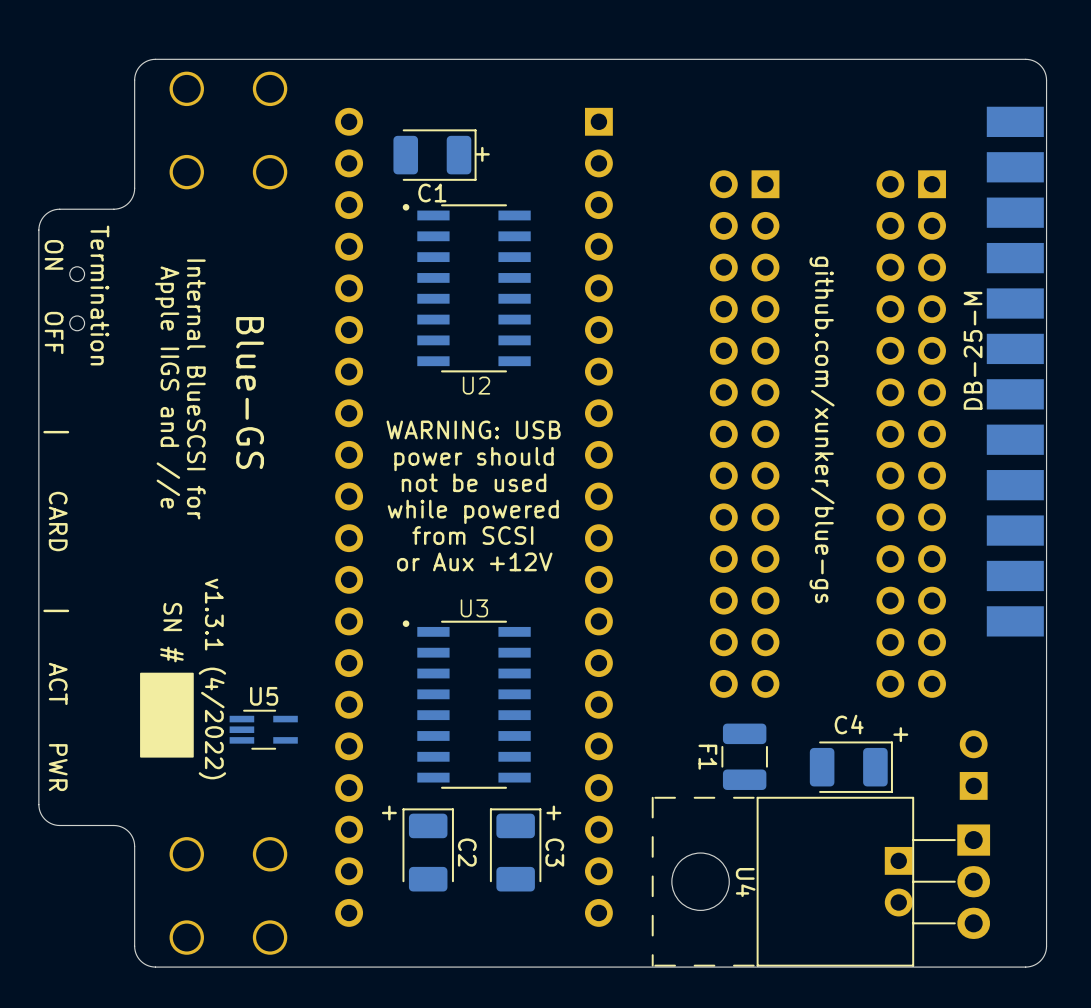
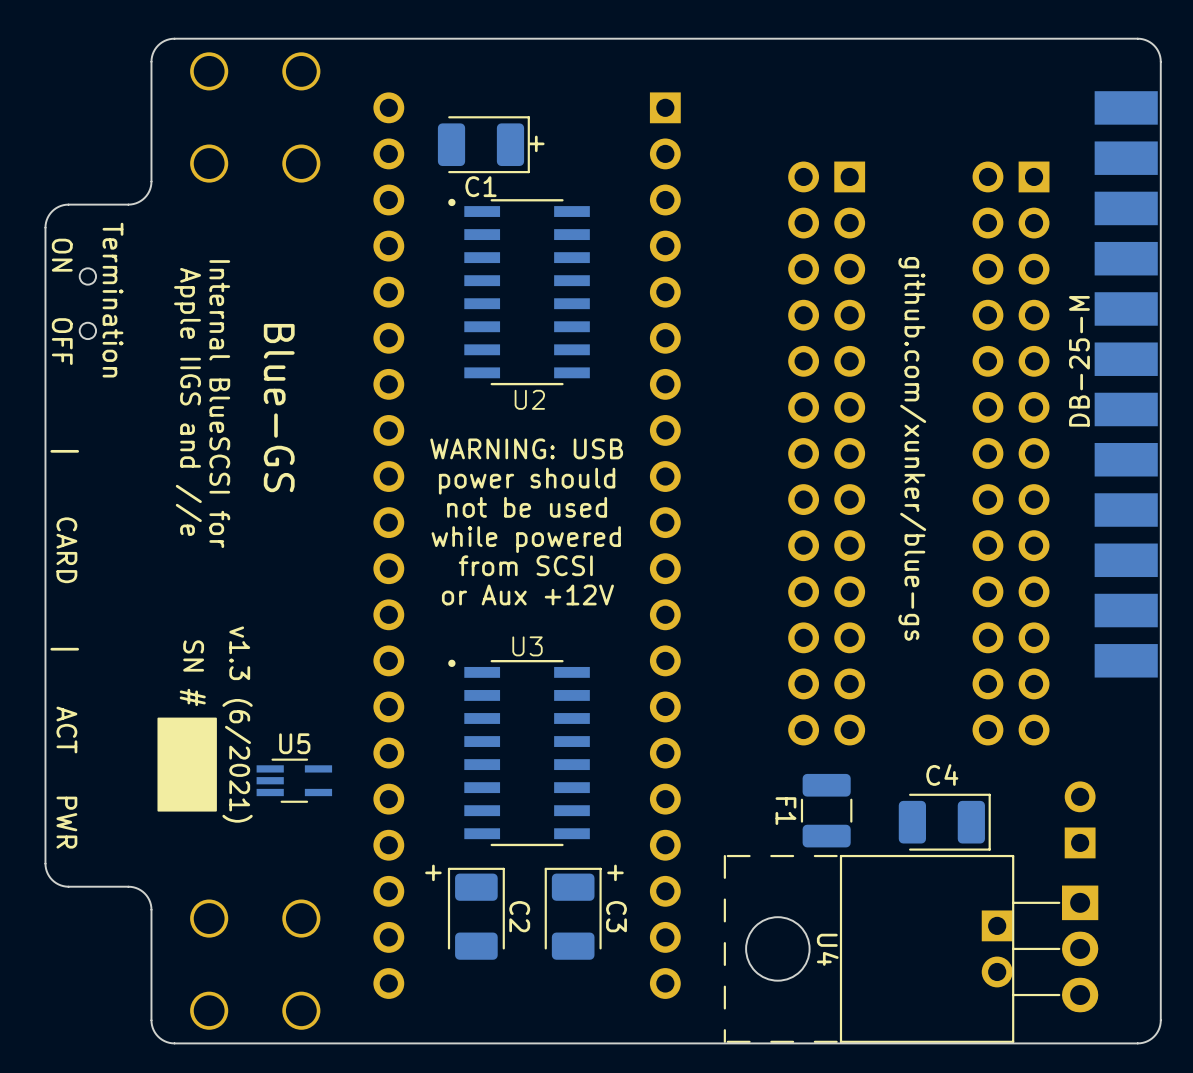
text: v1.3.1 (4/2022) (212, 678) -> v1.3 (6/2021) (237, 724)
text: + (900, 734) -> none

